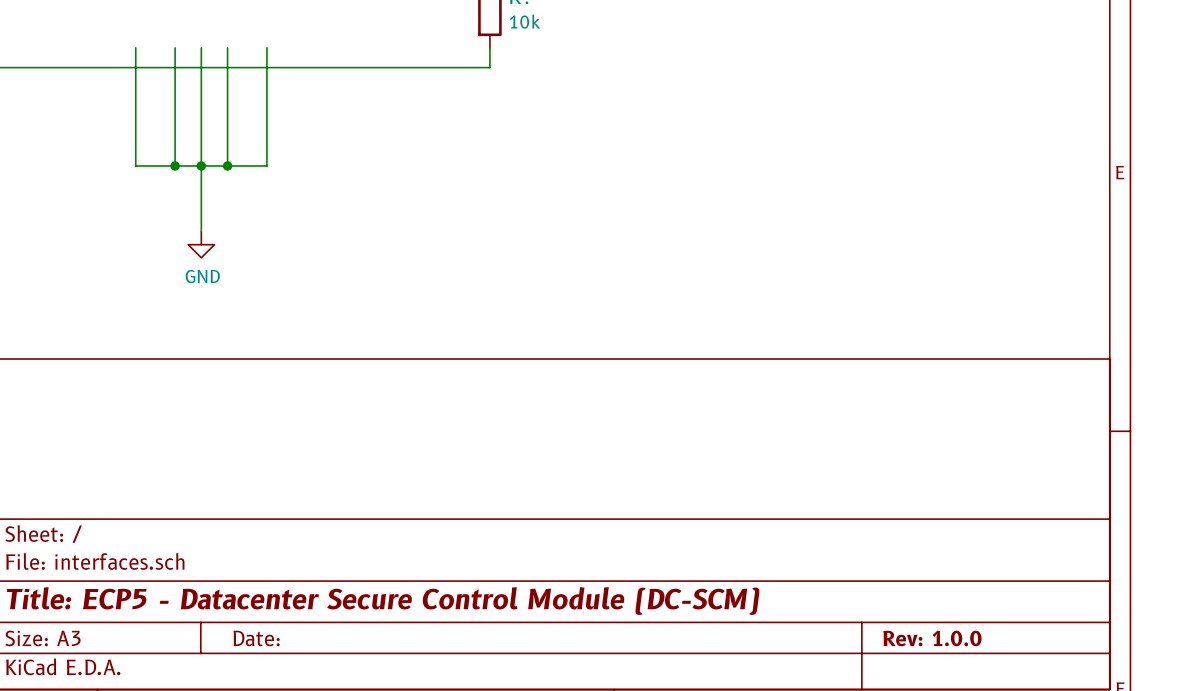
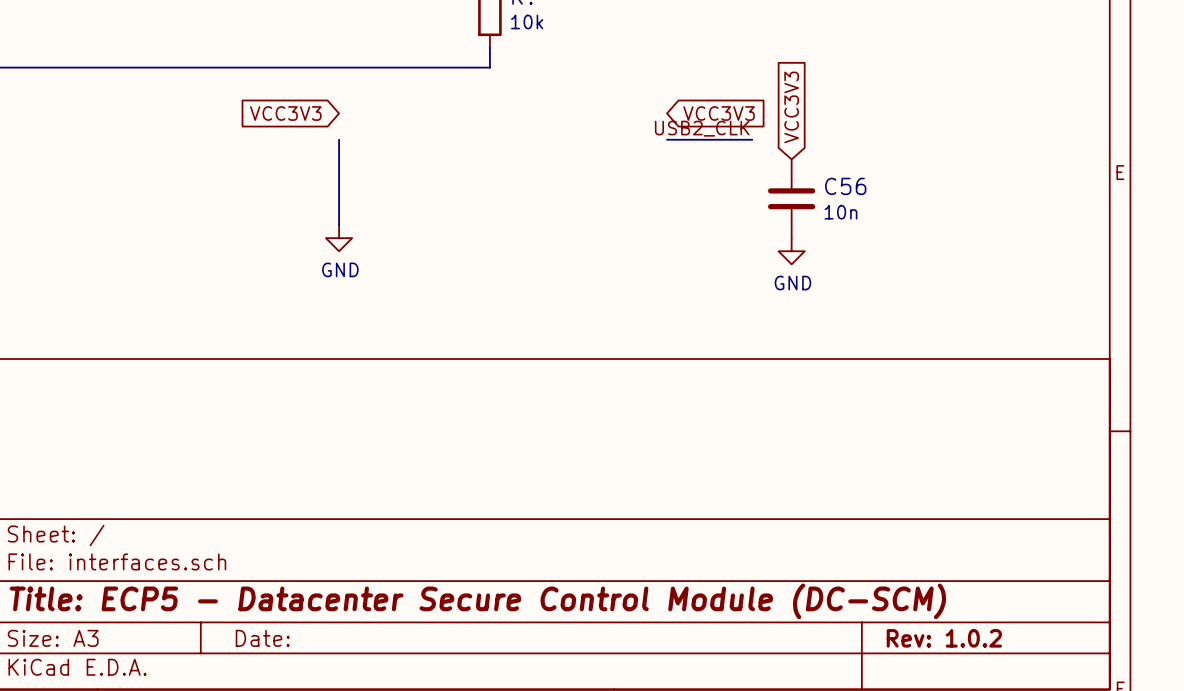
wire: (135, 47) (135, 165) (266, 165) (266, 47) -> none
wire: (175, 47) (175, 165) -> none
wire: (201, 47) (201, 231) -> none
wire: (227, 47) (227, 165) -> none
global label: none -> VCC3V3 (791, 107)
global label: none -> VCC3V3 (285, 113)
global label: none -> VCC3V3 (719, 113)
label: none -> USB2_CLK (702, 128)
wire: none -> (339, 139) (339, 225)
wire: none -> (667, 139) (752, 139)
junction: (175, 165) -> none
junction: (201, 165) -> none
junction: (227, 165) -> none
C56: none -> (791, 198)
power symbol position: GND (201, 244) -> GND (339, 238)
power symbol: none -> GND (791, 251)
title block: Rev: 1.0.0 (932, 638) -> Rev: 1.0.2 (944, 638)

